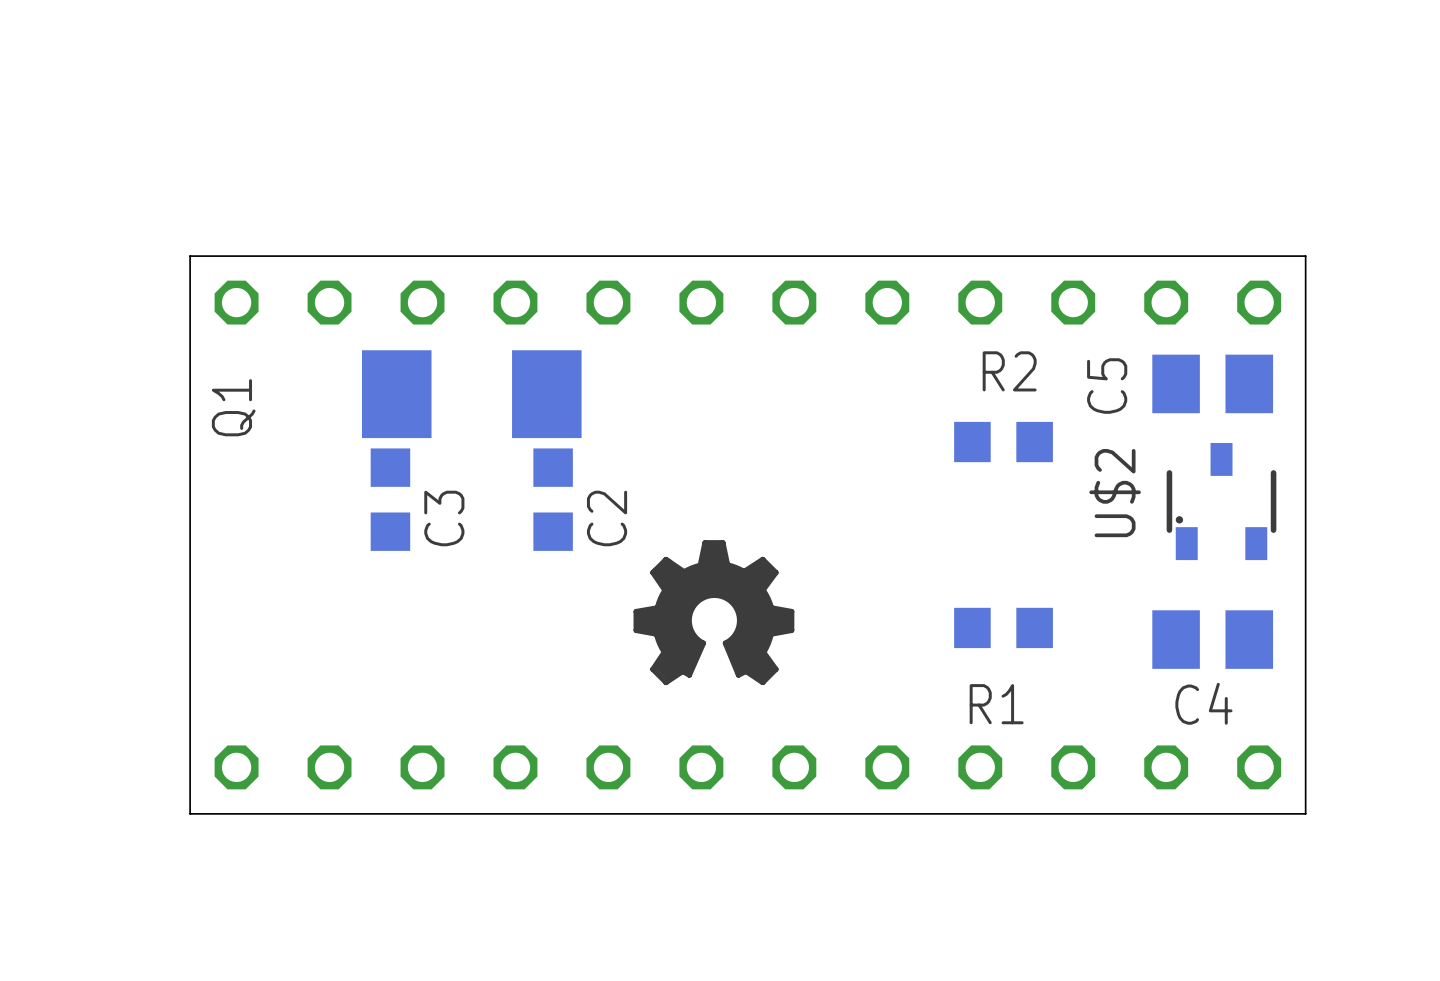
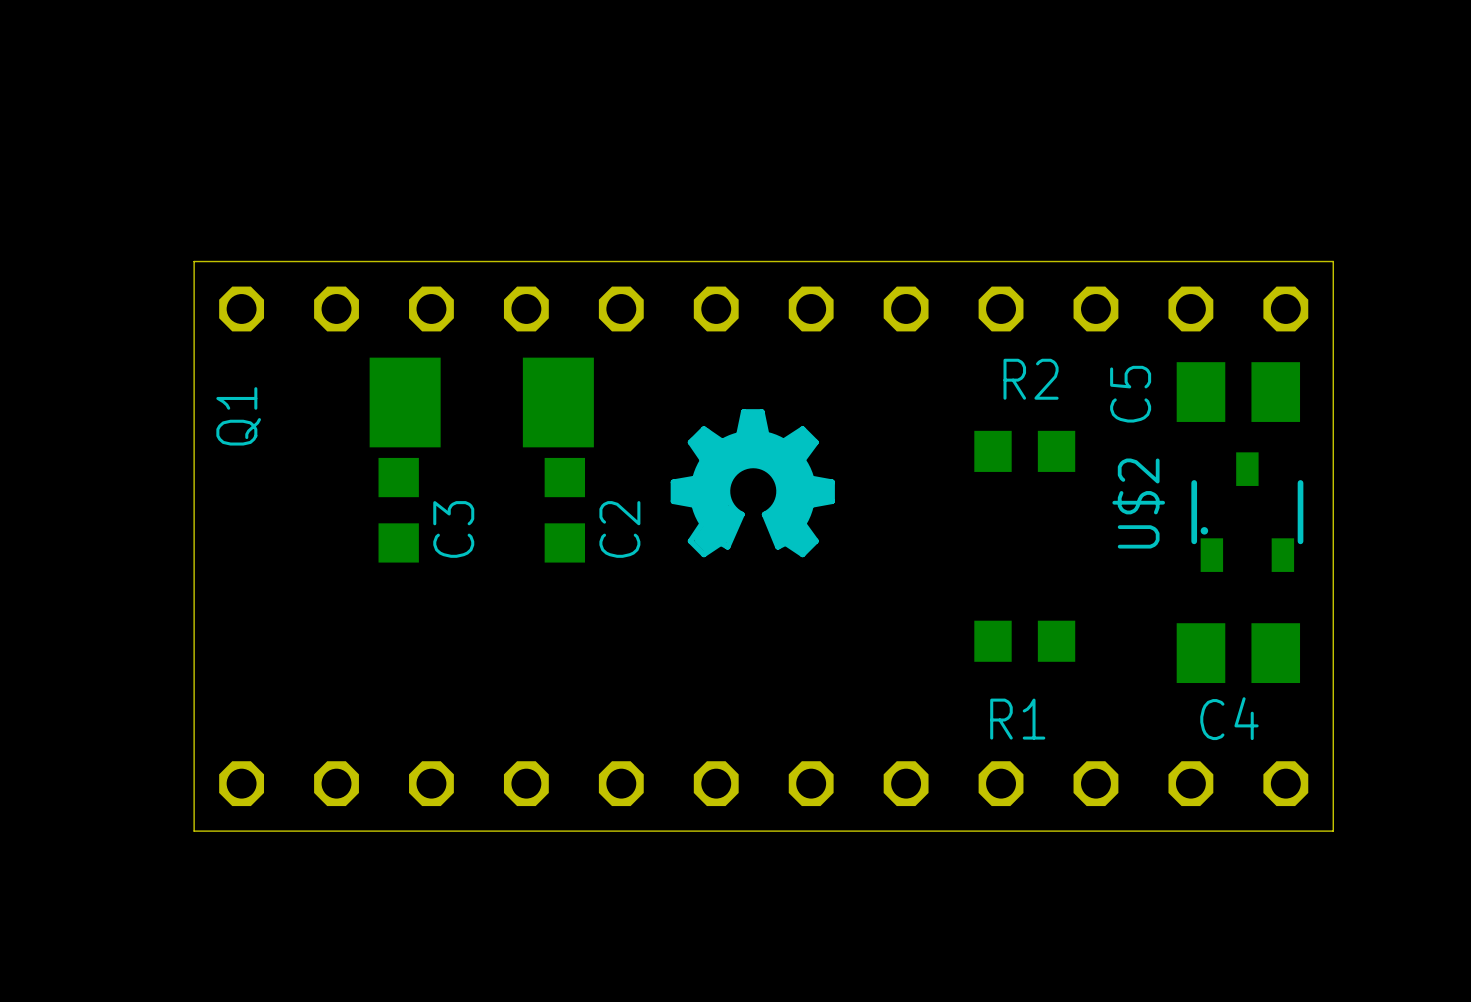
drawing position: (713, 612) -> (752, 483)

